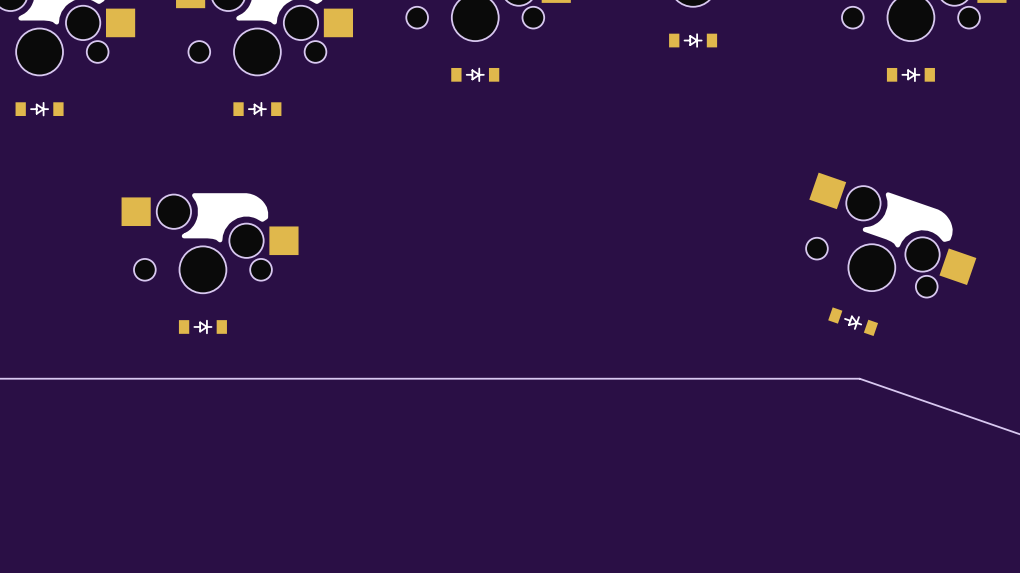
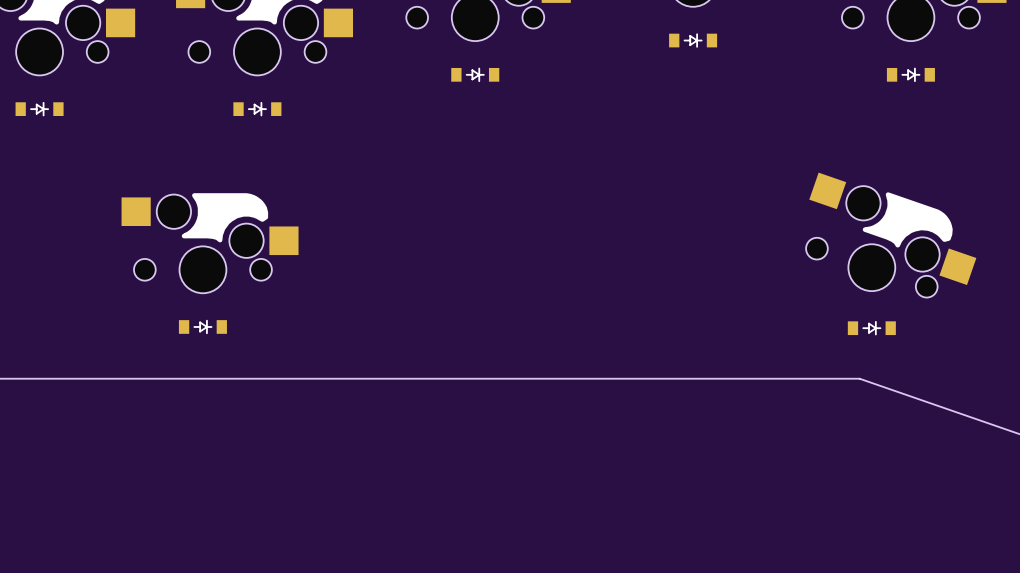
part: (853, 321) -> none
part: none -> (871, 328)

